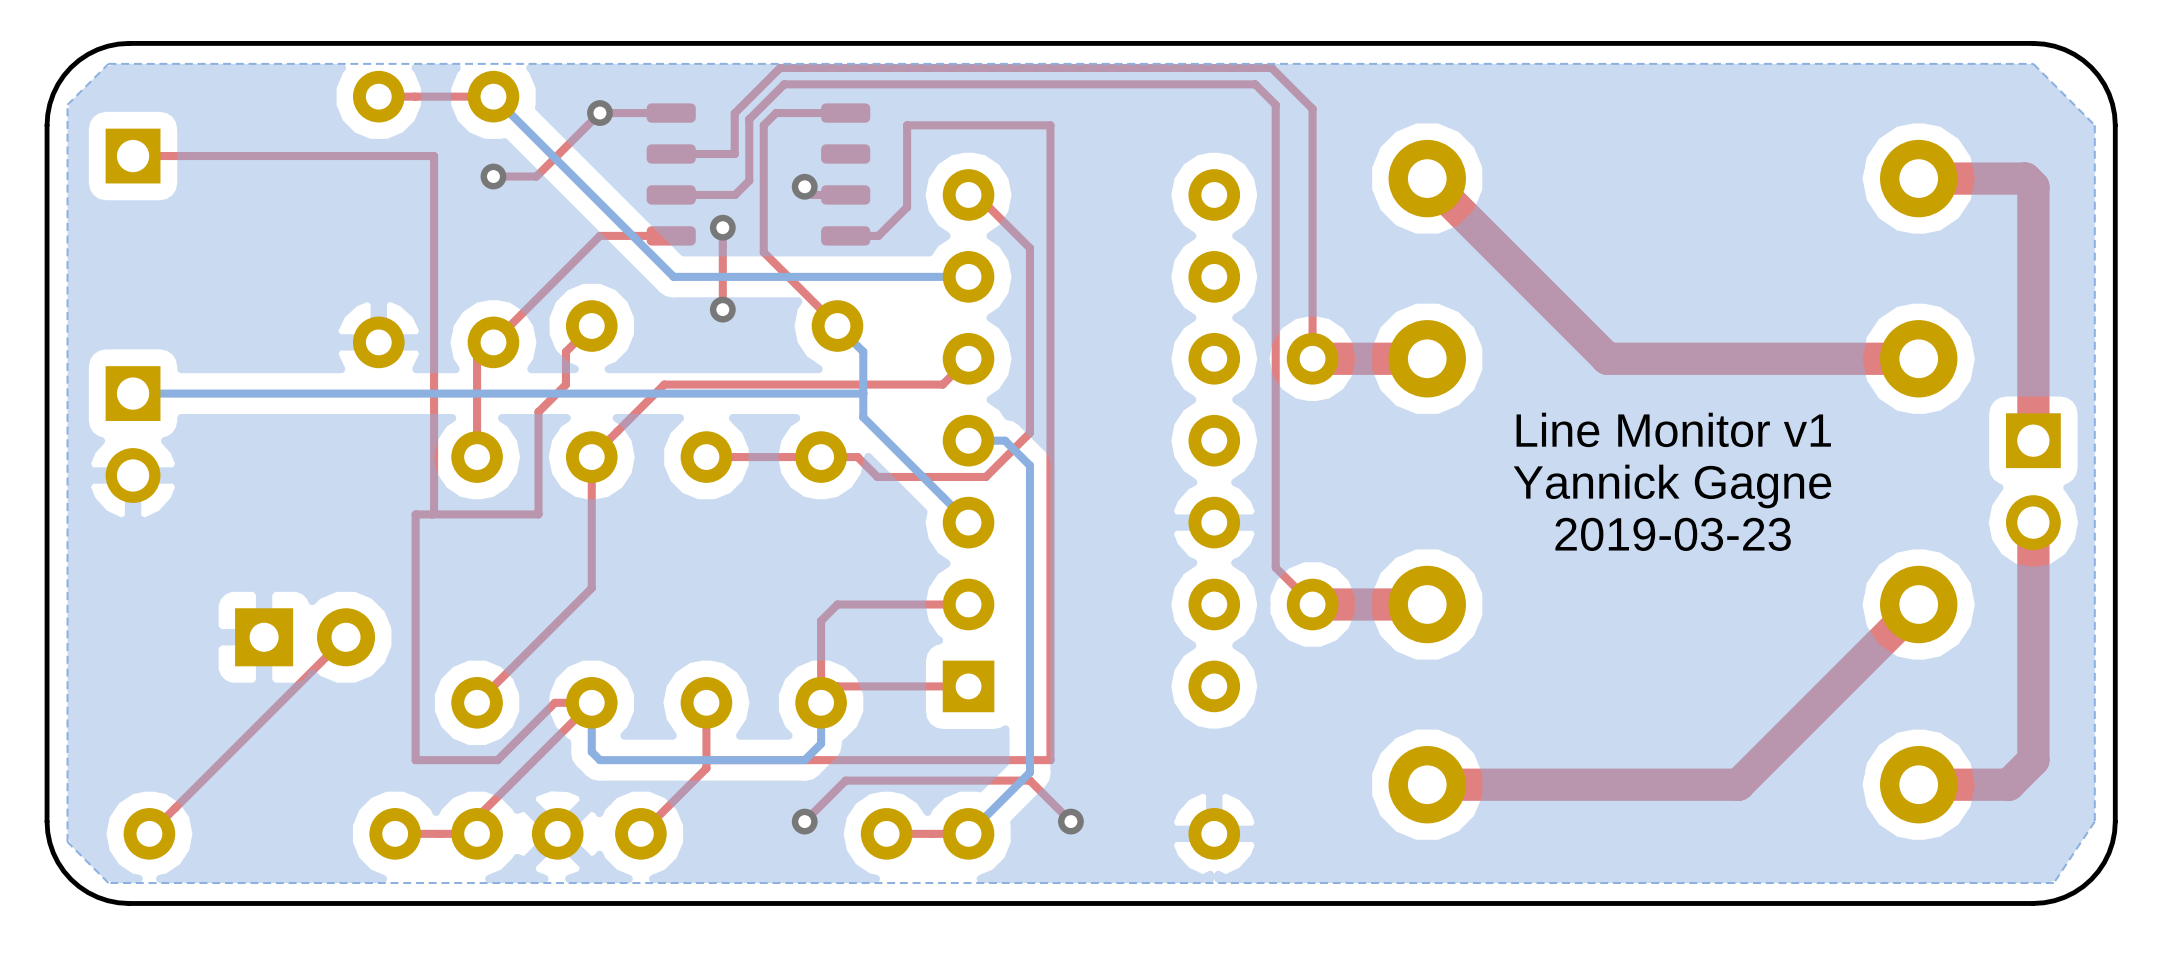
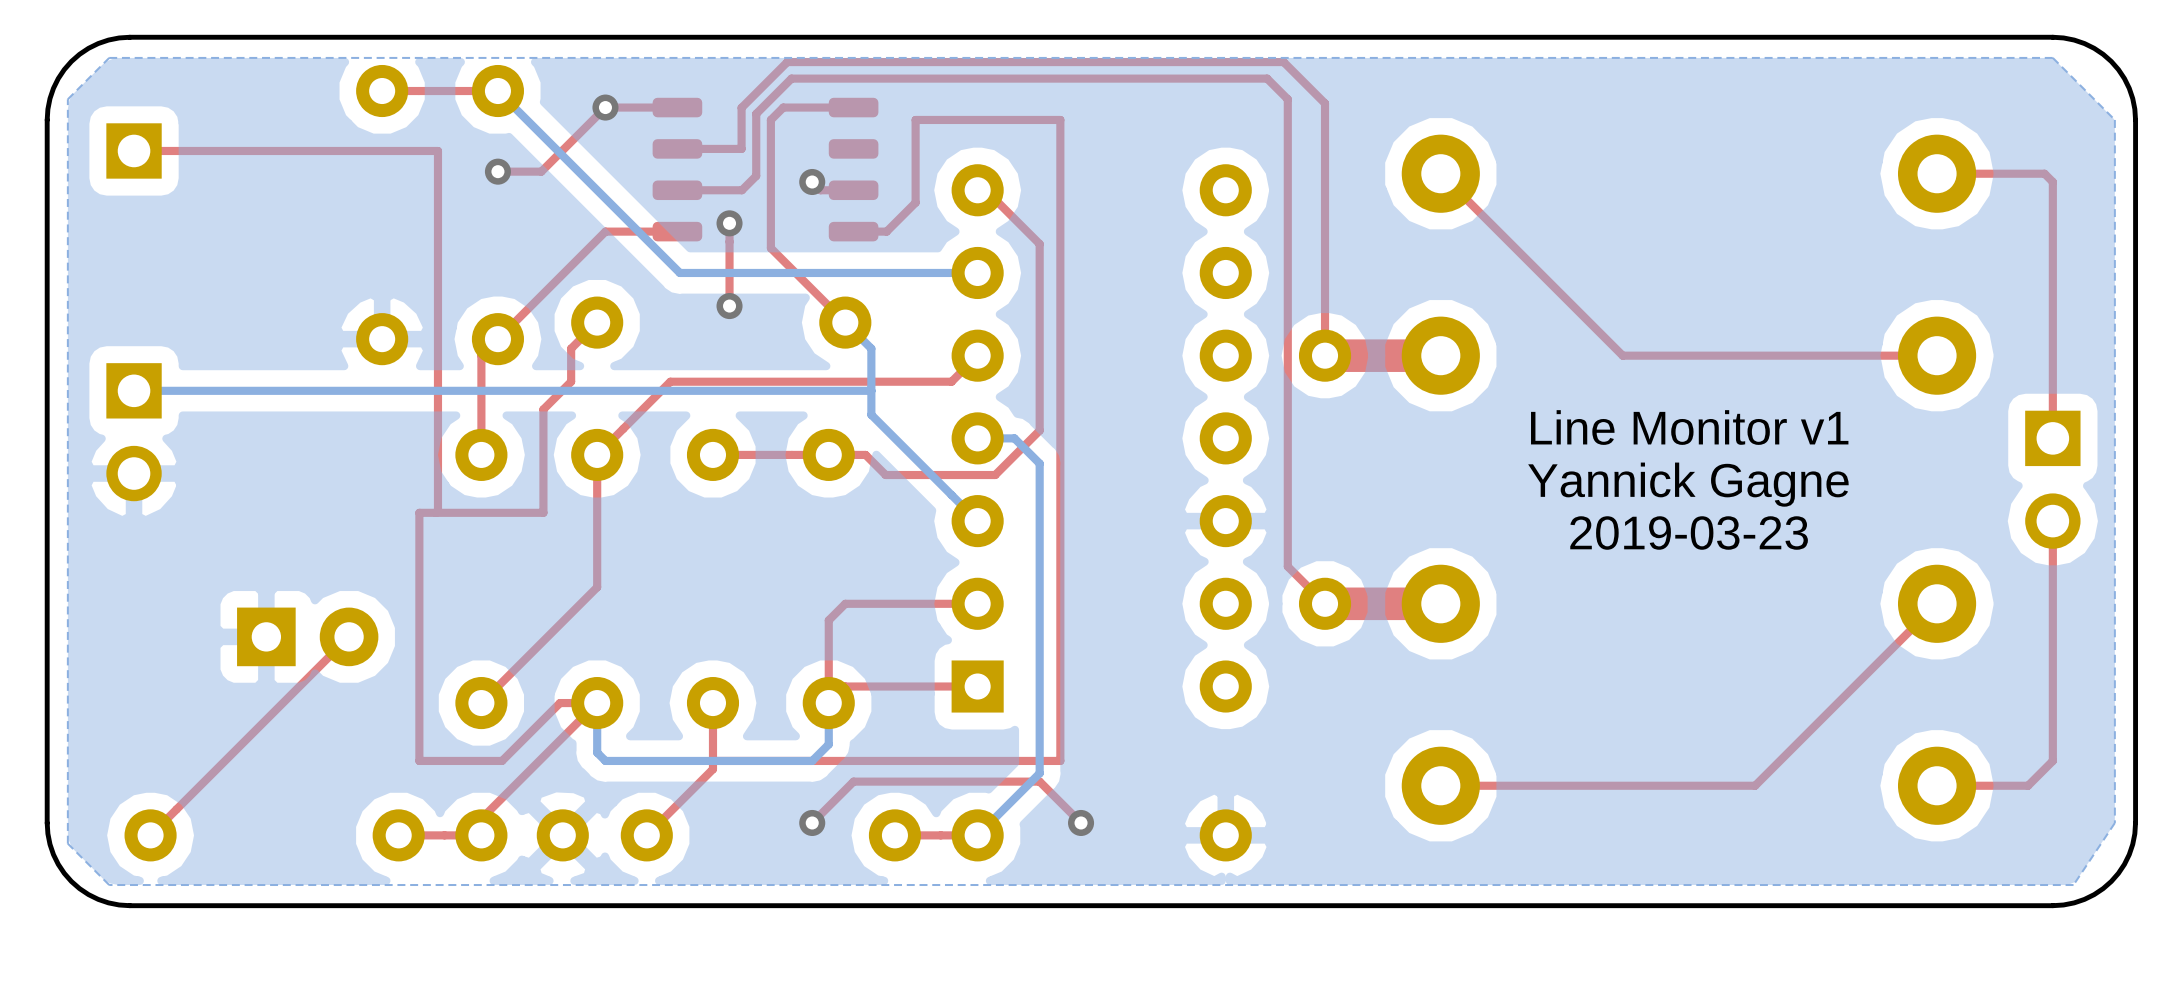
top track width: thick (1427, 178) (1607, 358) (1918, 358) -> thin (1440, 173) (1622, 355) (1937, 355)
top track width: thick (1918, 178) (2025, 178) (2033, 186) (2033, 440) -> thin (1937, 173) (2044, 173) (2052, 181) (2052, 438)
top track width: thick (2033, 522) (2033, 760) (2008, 784) (1918, 784) -> thin (2052, 521) (2052, 760) (2028, 785) (1937, 785)
top track width: thick (1918, 604) (1738, 784) (1427, 784) -> thin (1937, 603) (1755, 785) (1440, 785)

